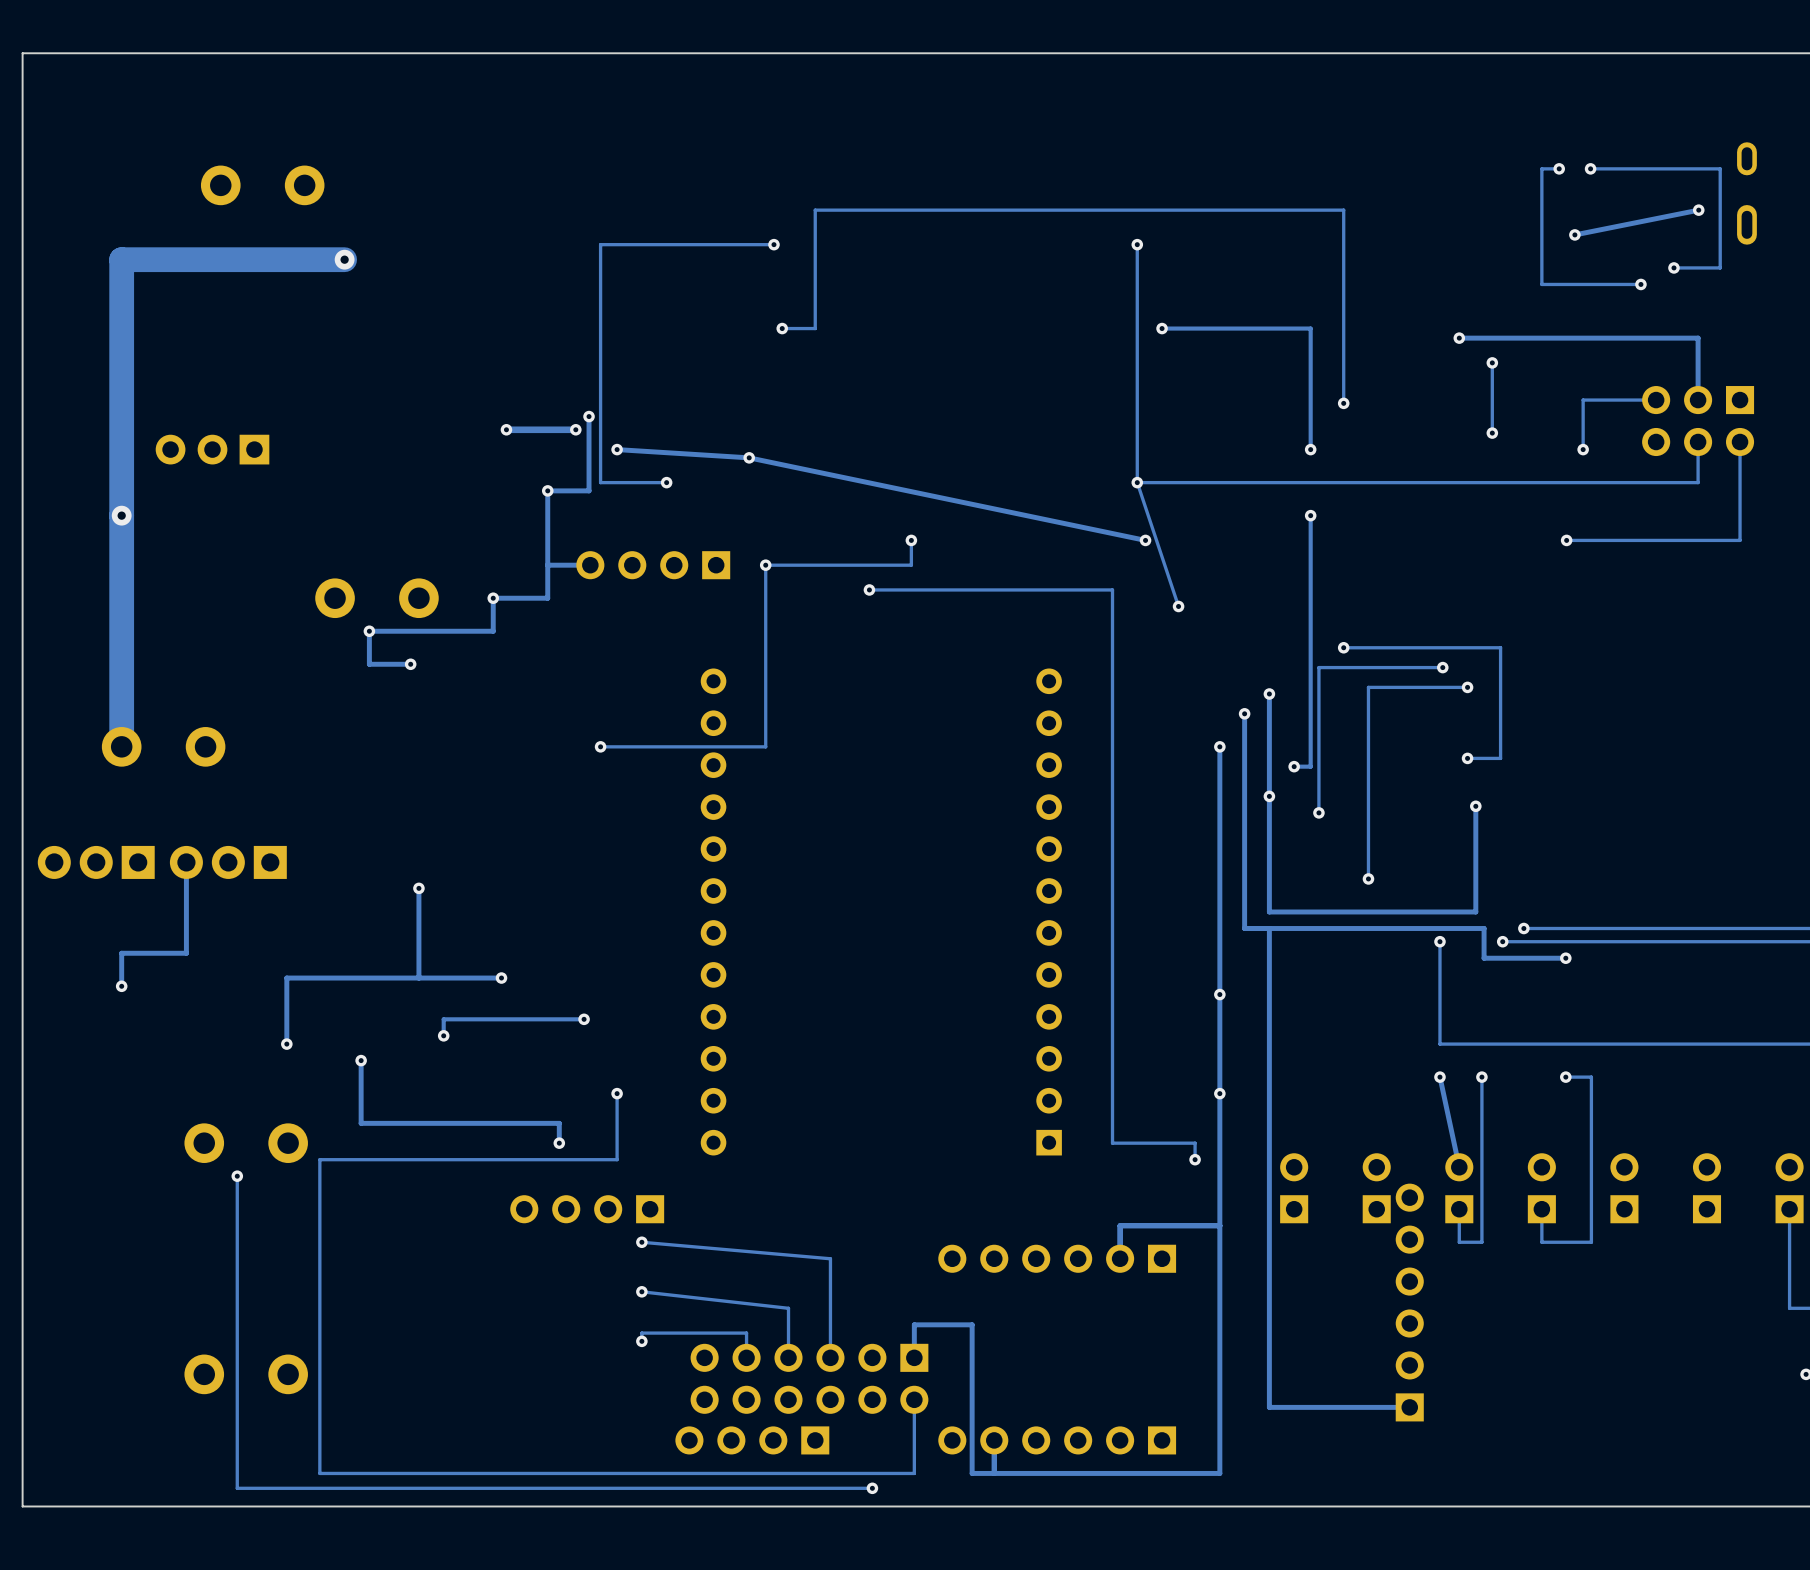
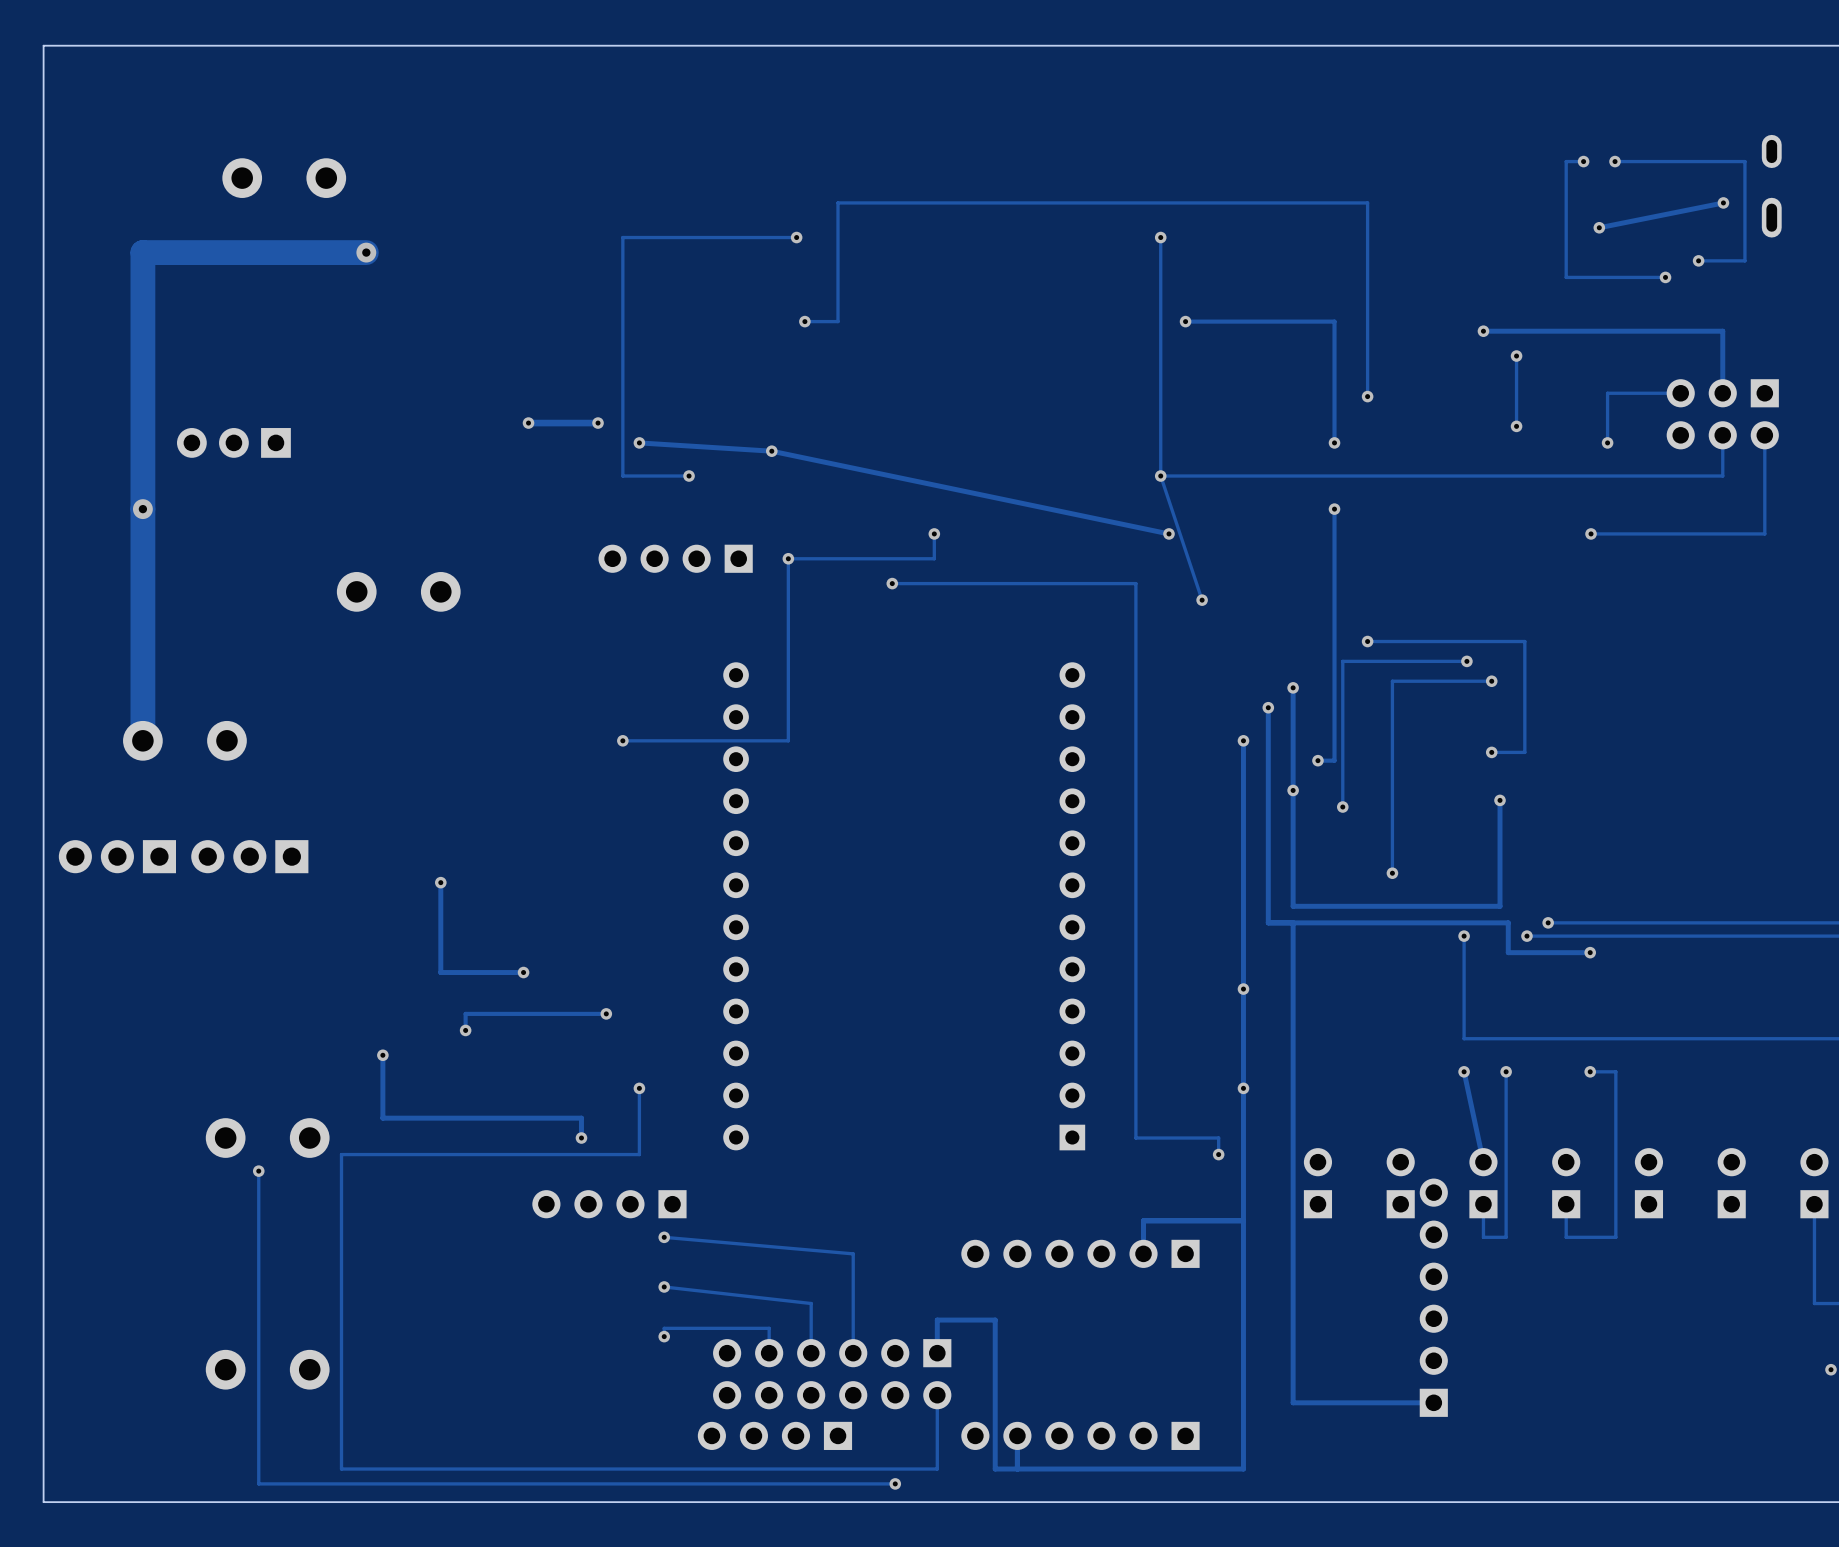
track: (589, 416) (589, 490) (547, 490) (547, 598) (493, 598) (493, 631) (369, 631) (369, 664) (410, 664) -> none
via: (589, 416) -> none
via: (547, 490) -> none
track: (590, 565) (547, 565) -> none
via: (493, 598) -> none
via: (369, 631) -> none
via: (410, 664) -> none
track: (186, 862) (186, 953) (121, 953) (121, 986) -> none
track: (418, 978) (286, 978) (286, 1044) -> none
via: (121, 986) -> none
via: (286, 1044) -> none

